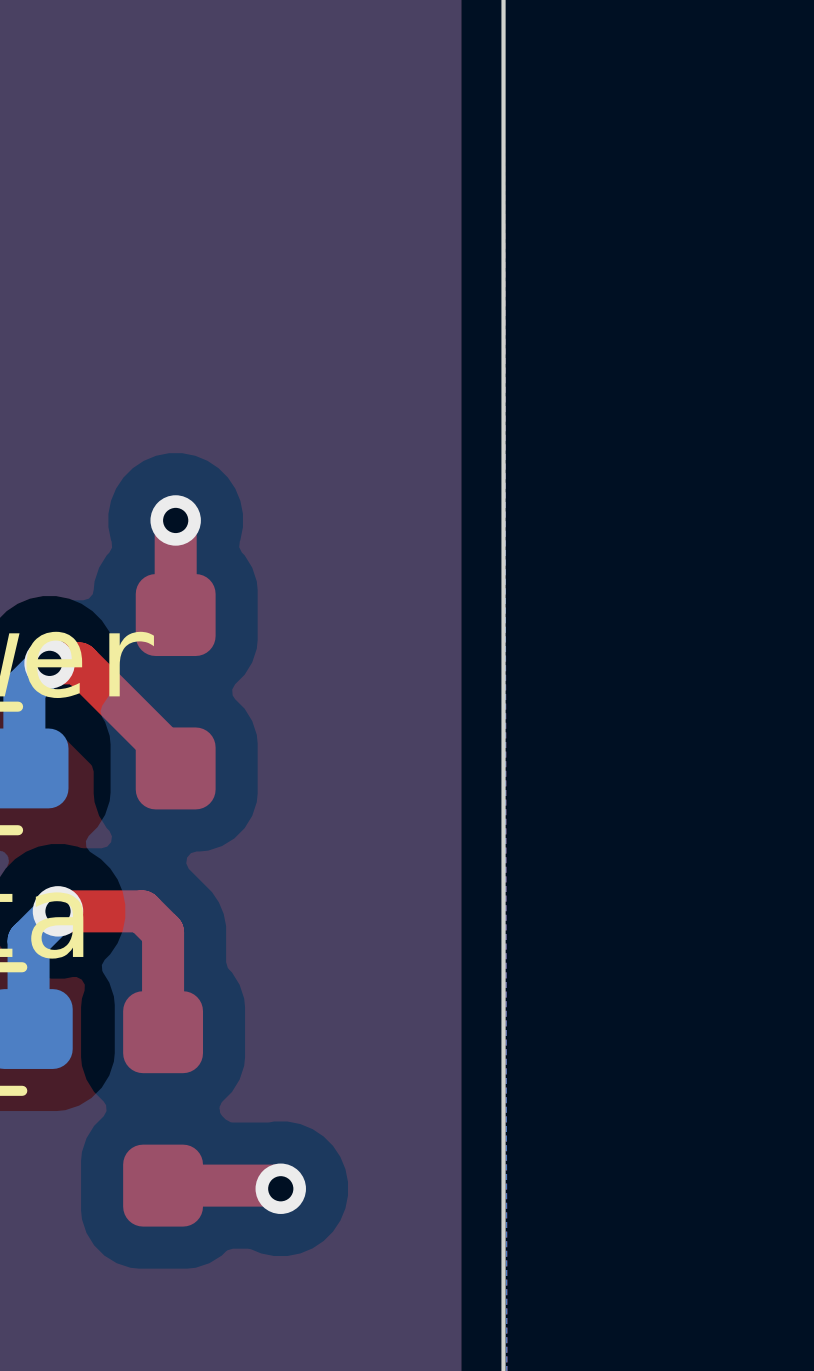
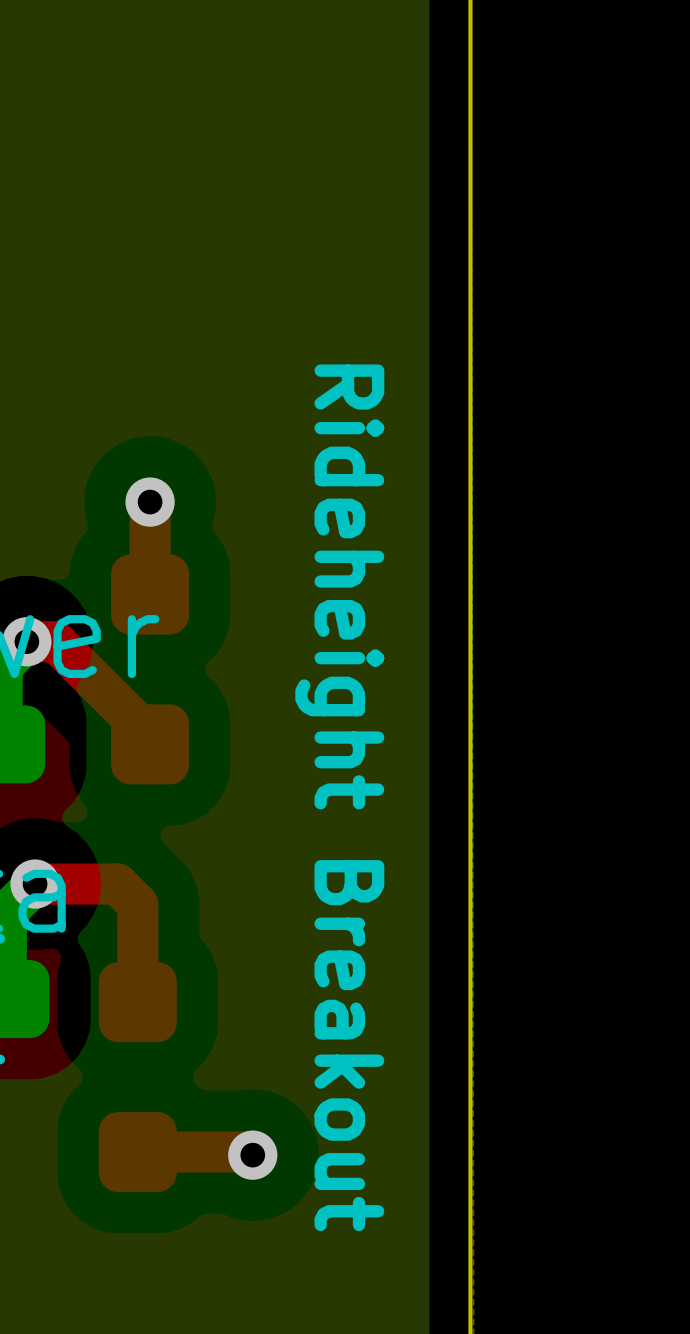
text: none -> Rideheight Breakout (339, 797)

